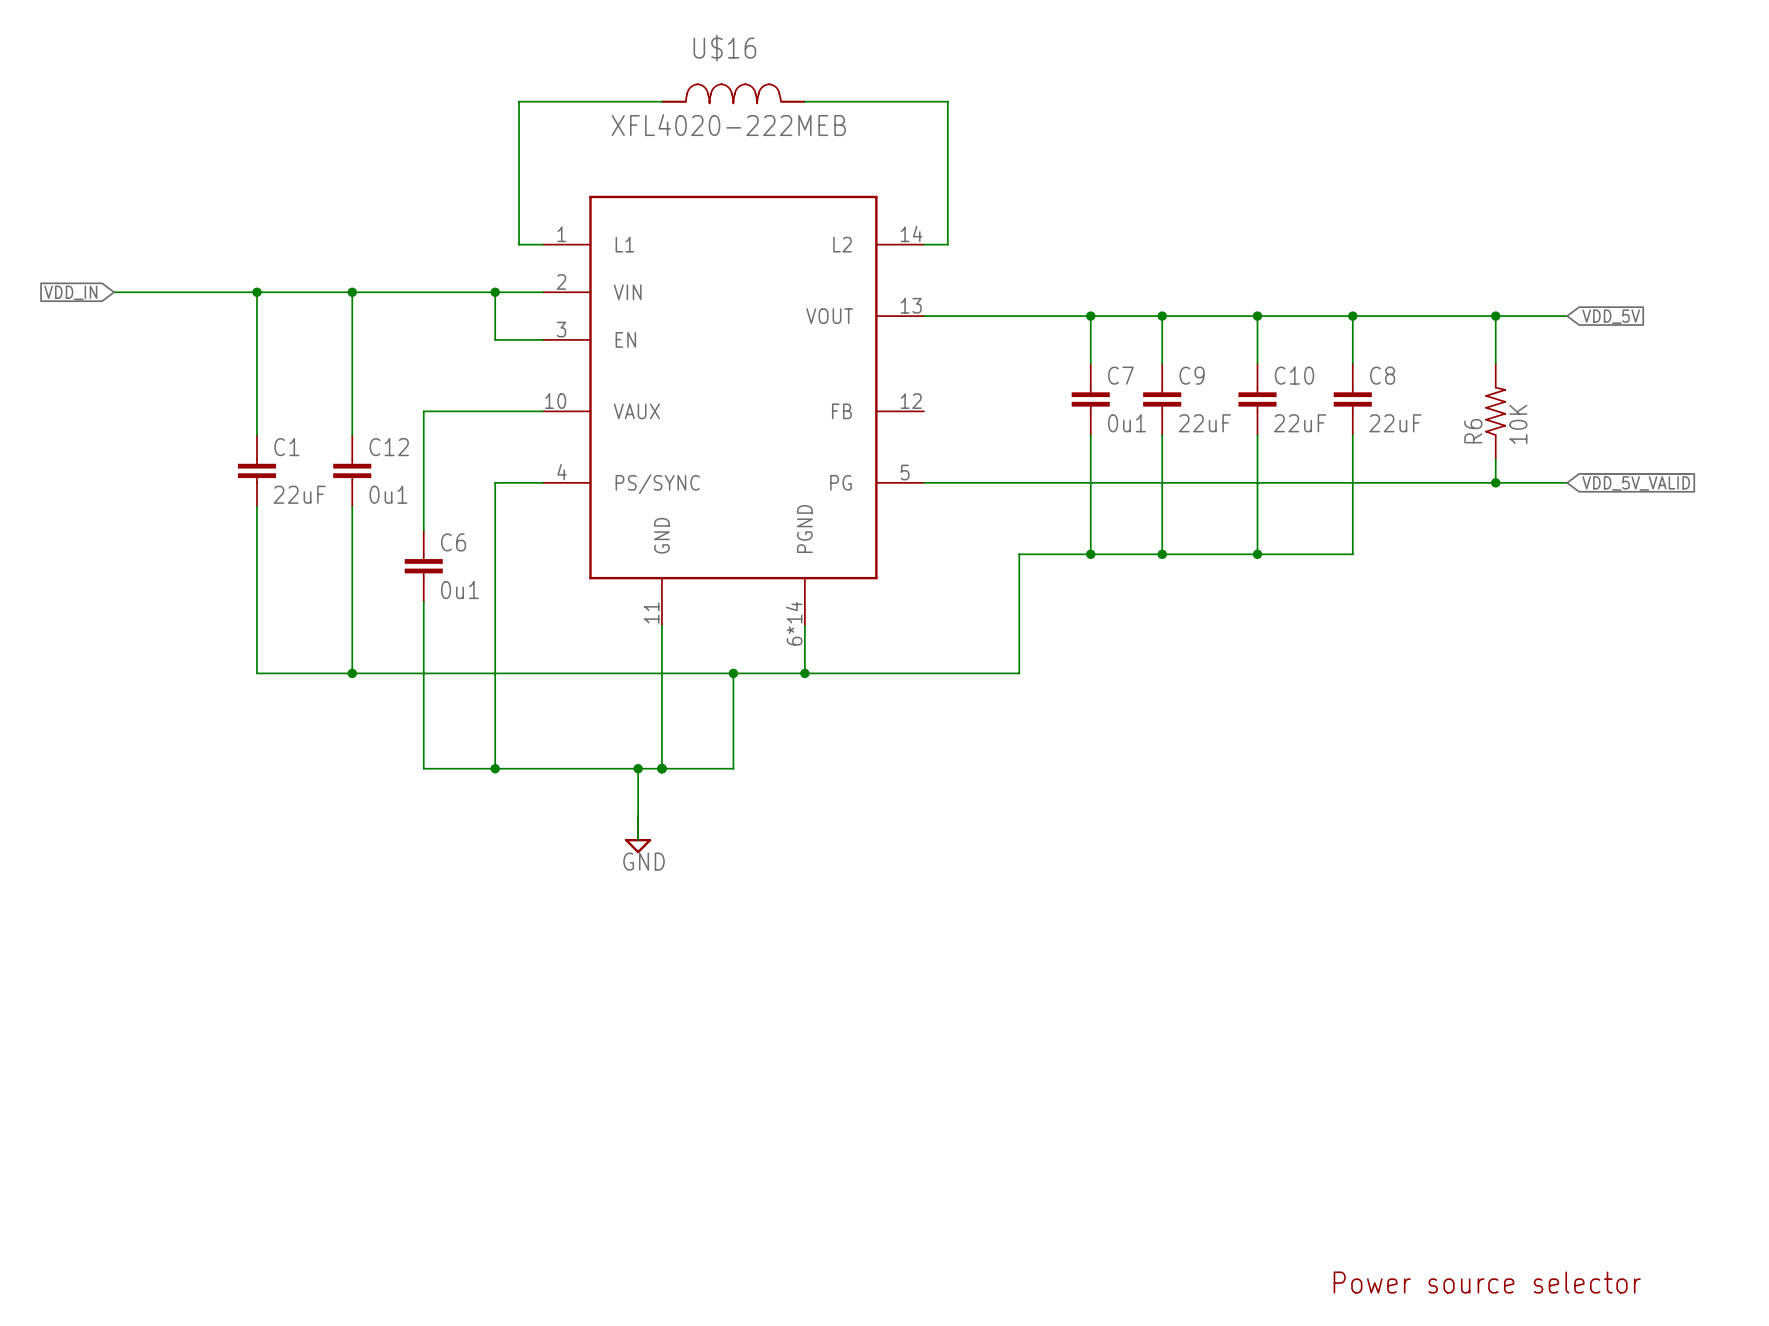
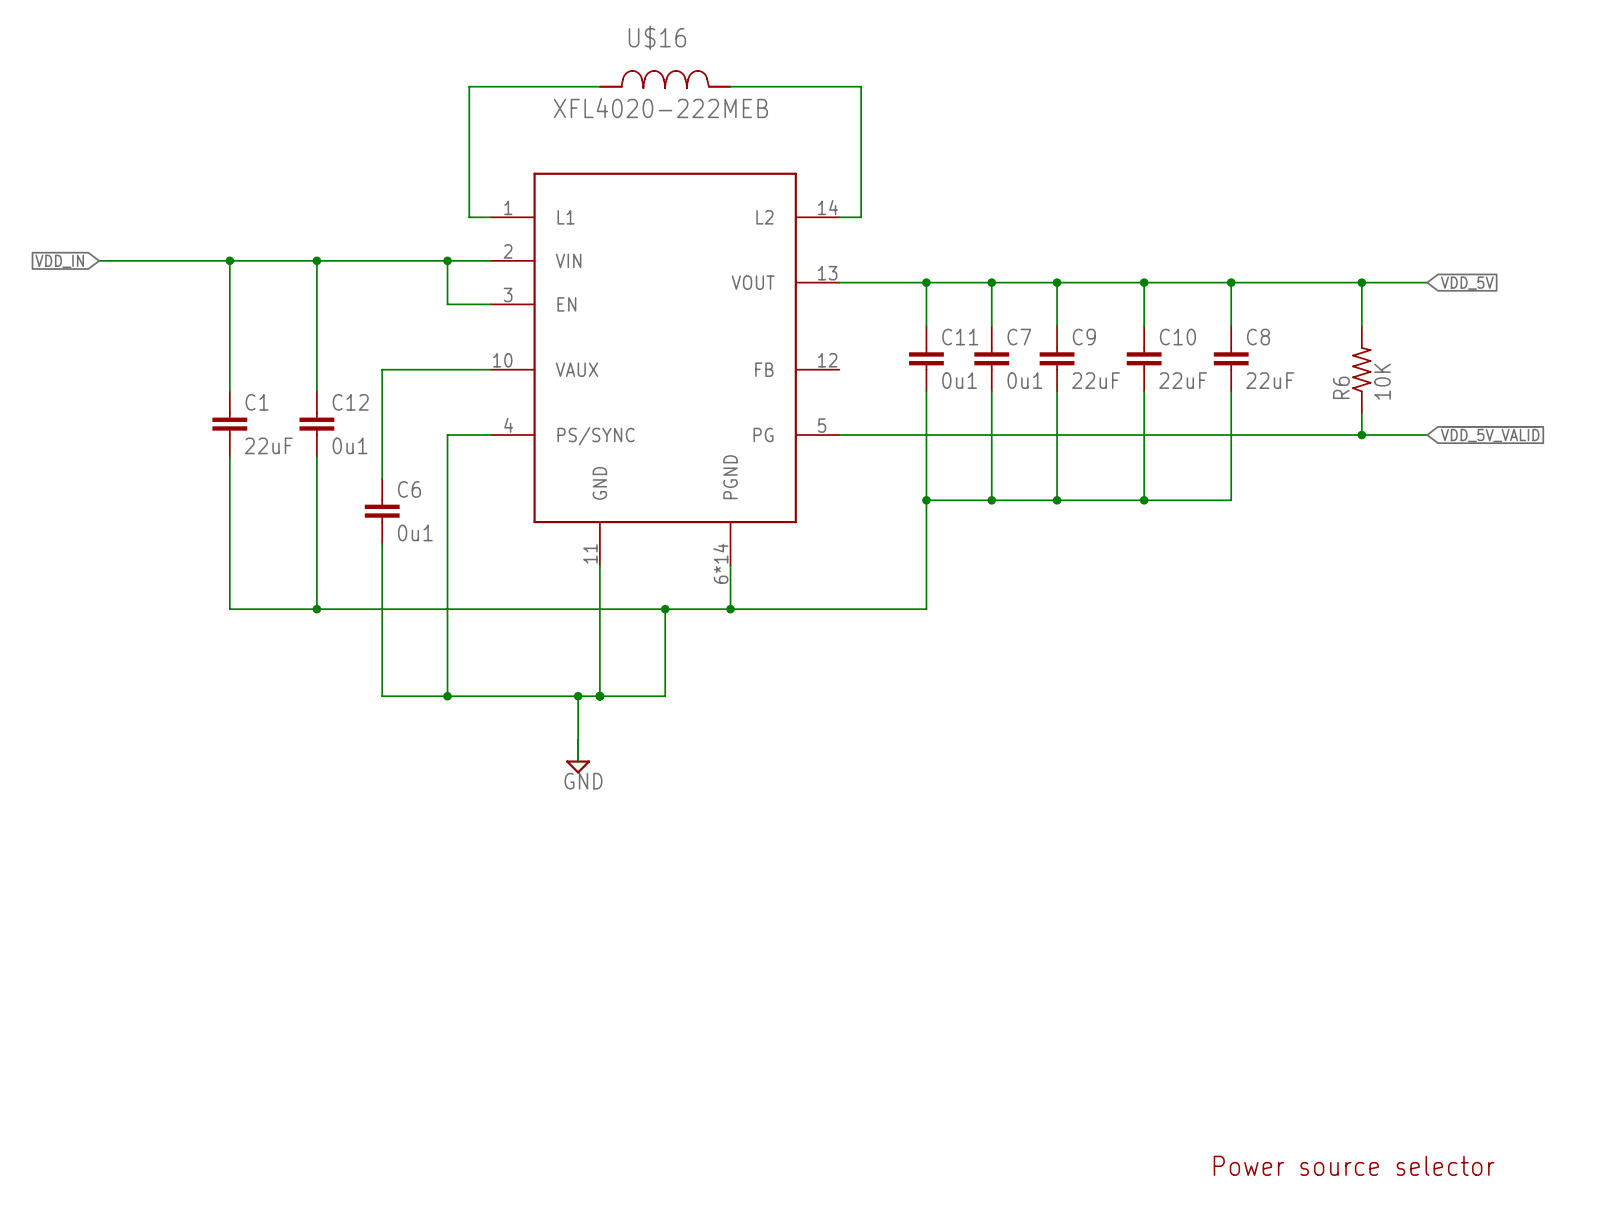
wire: none -> (926, 282) (926, 326)
junction: none -> (926, 282)
C11: none -> 0u1 (926, 358)
wire: none -> (926, 391) (926, 500)
junction: none -> (926, 500)

